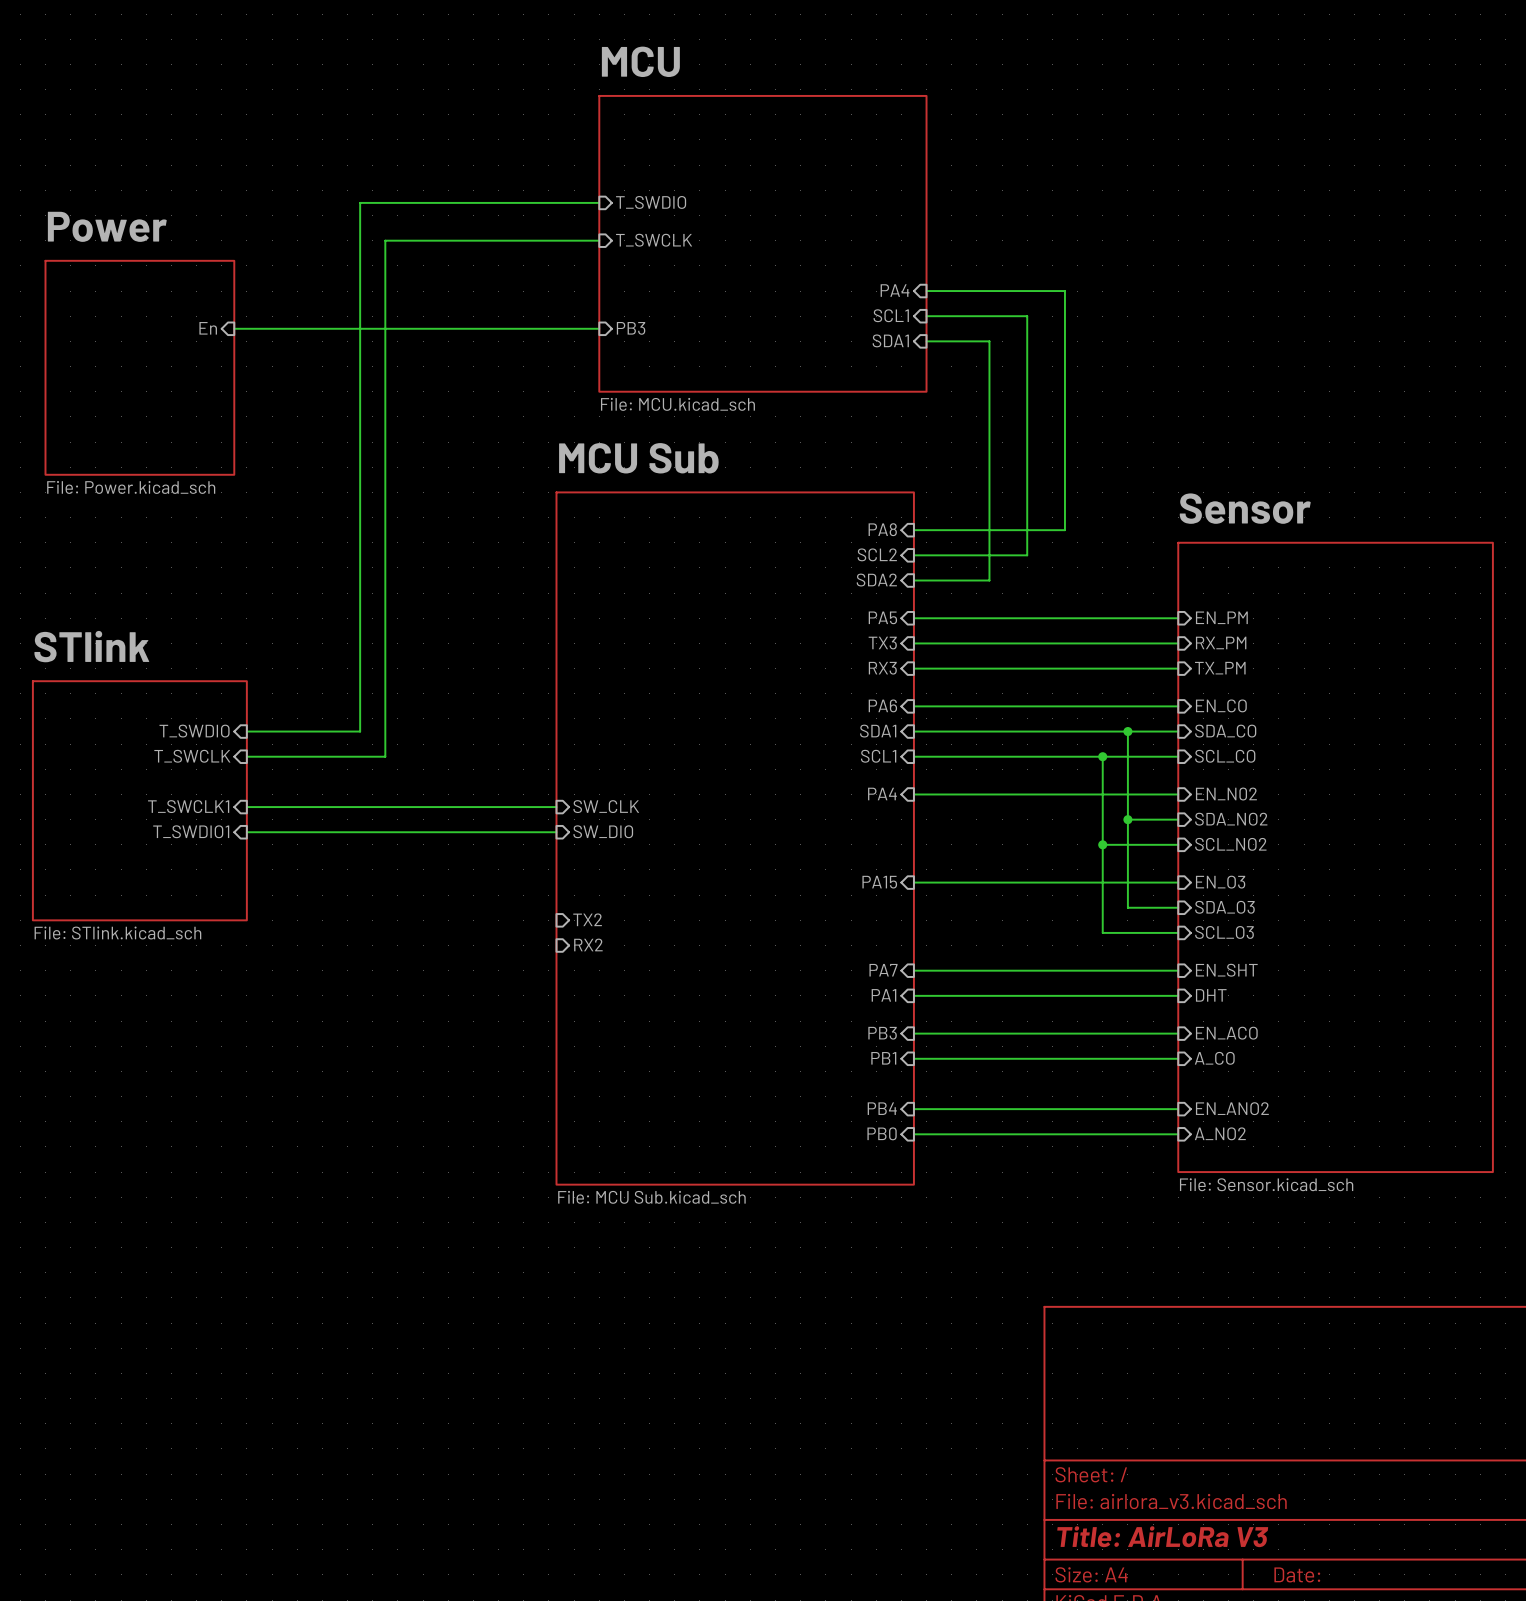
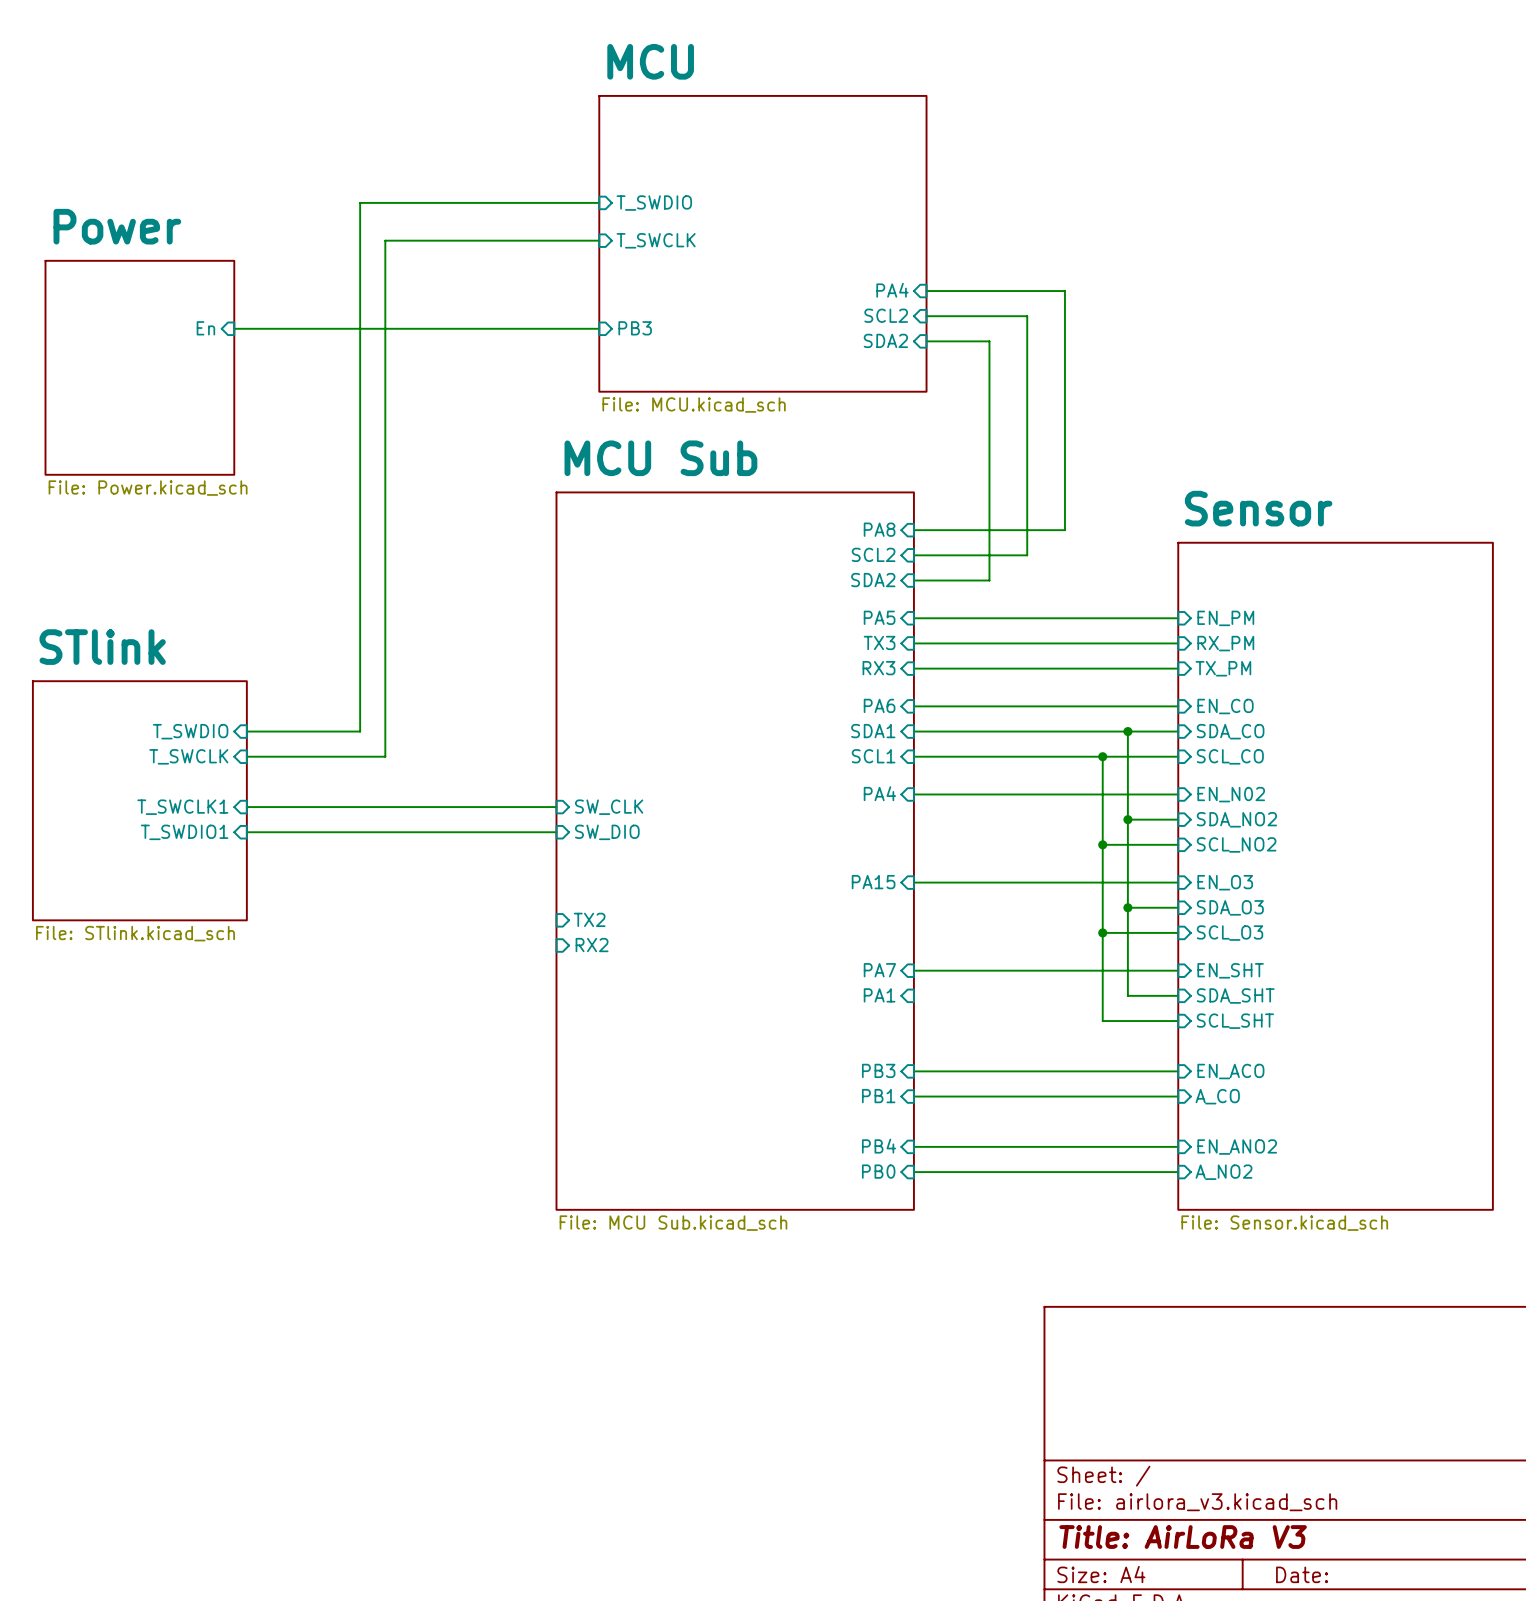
sheet pin: SCL1 (891, 315) -> SCL2 (886, 315)
sheet pin: SDA1 (890, 340) -> SDA2 (885, 340)
sheet MCU Sub: File: MCU Sub.kicad_sch (735, 838) -> none
sheet MCU Sub: none -> File: MCU Sub.kicad_sch (735, 851)
sheet Sensor: File: Sensor.kicad_sch (1335, 857) -> none
sheet Sensor: none -> File: Sensor.kicad_sch (1335, 876)
junction: none -> (1127, 907)
wire: none -> (1102, 932) (1102, 1021) (1178, 1021)
junction: none -> (1102, 932)
wire: (913, 995) (1127, 995) -> (1127, 907) (1127, 995)
sheet pin: DHT (1211, 995) -> SDA_SHT (1235, 995)
sheet pin: none -> SCL_SHT (1235, 1021)
sheet pin position: PB3 (882, 1033) -> PB3 (878, 1070)
wire: (913, 1033) (1178, 1033) -> (913, 1071) (1178, 1071)
sheet pin position: EN_ACO (1226, 1033) -> EN_ACO (1230, 1071)
sheet pin position: PB1 (883, 1058) -> PB1 (878, 1096)
wire: (913, 1058) (1178, 1058) -> (913, 1096) (1178, 1096)
sheet pin position: A_CO (1214, 1058) -> A_CO (1217, 1096)
sheet pin position: PB4 (882, 1108) -> PB4 (878, 1146)
sheet pin position: EN_ANO2 (1232, 1108) -> EN_ANO2 (1237, 1147)
wire: (913, 1109) (1178, 1109) -> (913, 1146) (1178, 1146)
sheet pin position: PB0 (882, 1133) -> PB0 (878, 1171)
sheet pin position: A_NO2 (1220, 1133) -> A_NO2 (1224, 1172)
wire: (913, 1134) (1178, 1134) -> (913, 1172) (1178, 1172)

